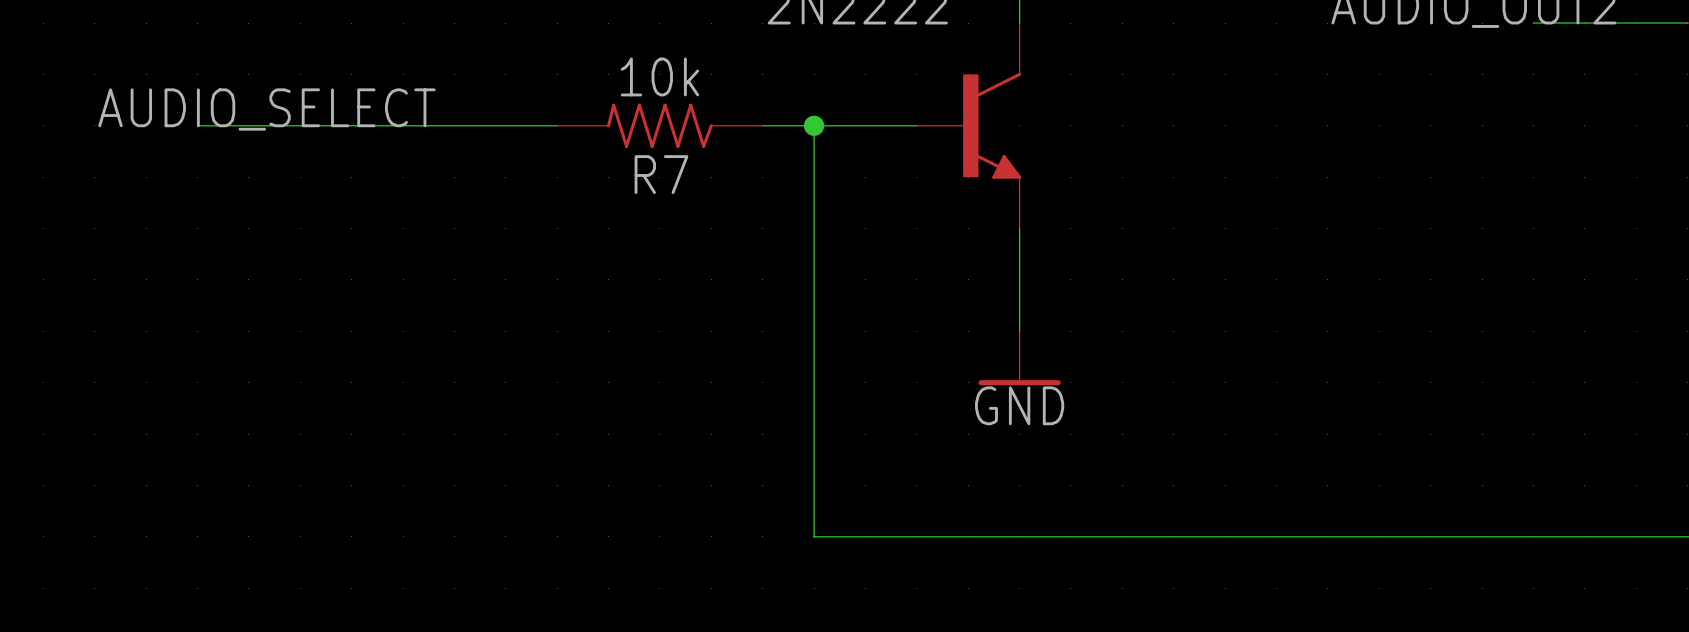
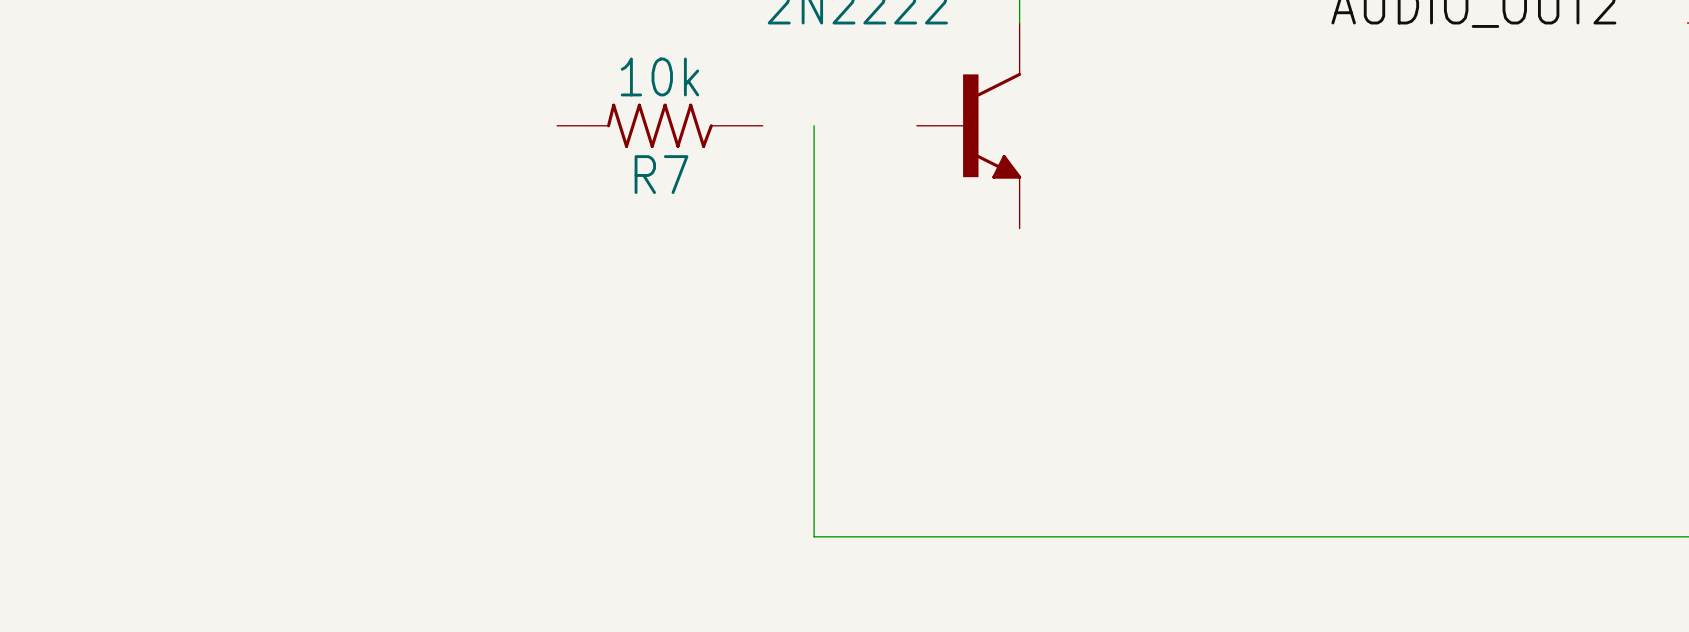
wire: (1533, 23) (1687, 23) -> none
label: AUDIO_SELECT (266, 109) -> none
wire: (197, 125) (557, 125) -> none
wire: (762, 125) (916, 125) -> none
junction: (814, 125) -> none
wire: (1019, 228) (1019, 331) -> none
power symbol: GND (1019, 358) -> none

